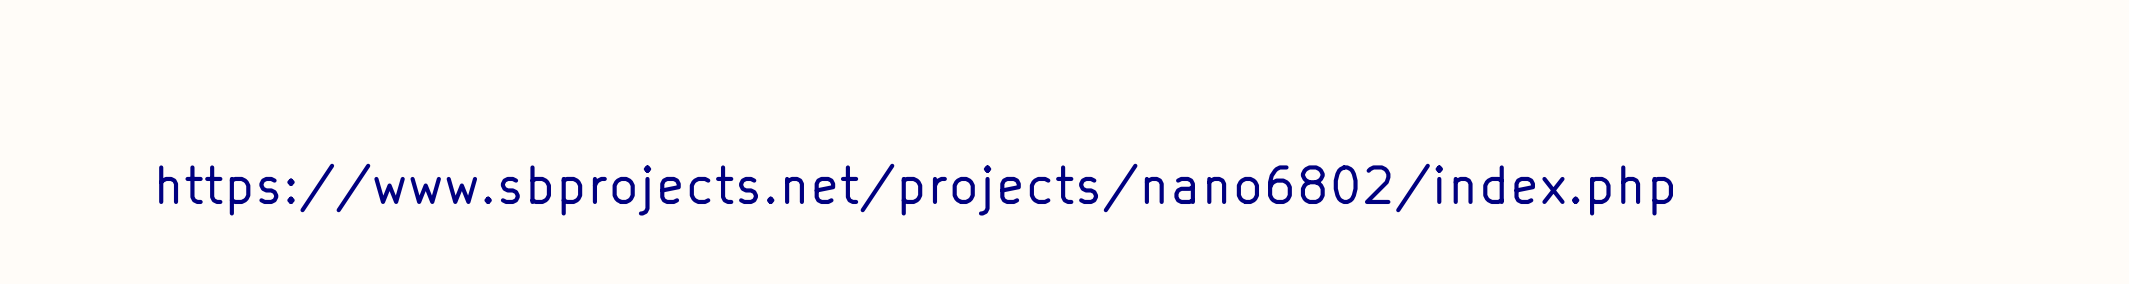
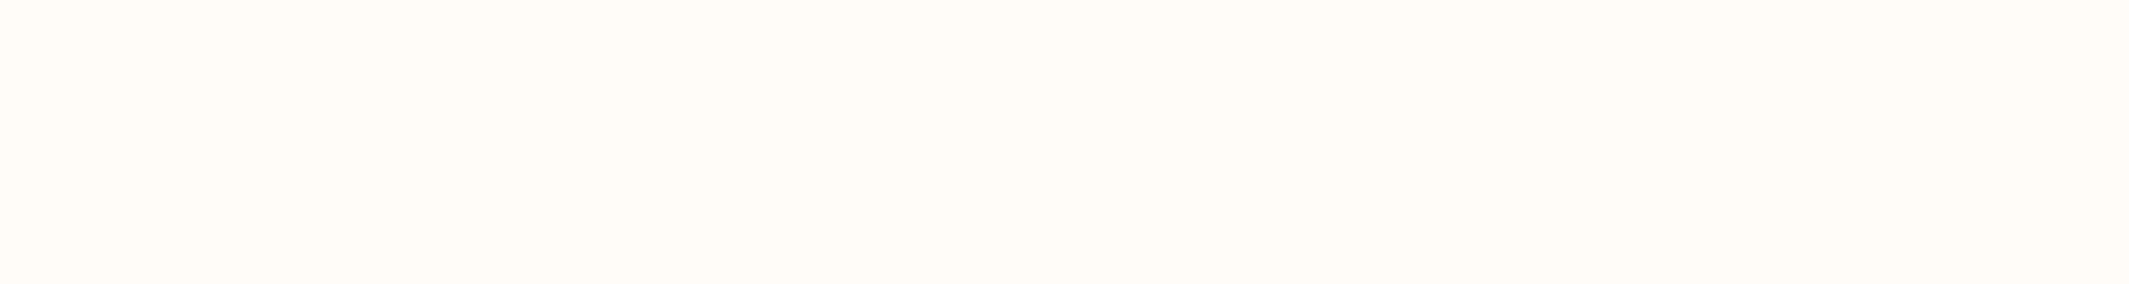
text: https://www.sbprojects.net/projects/nano6802/index.php (916, 189) -> none

